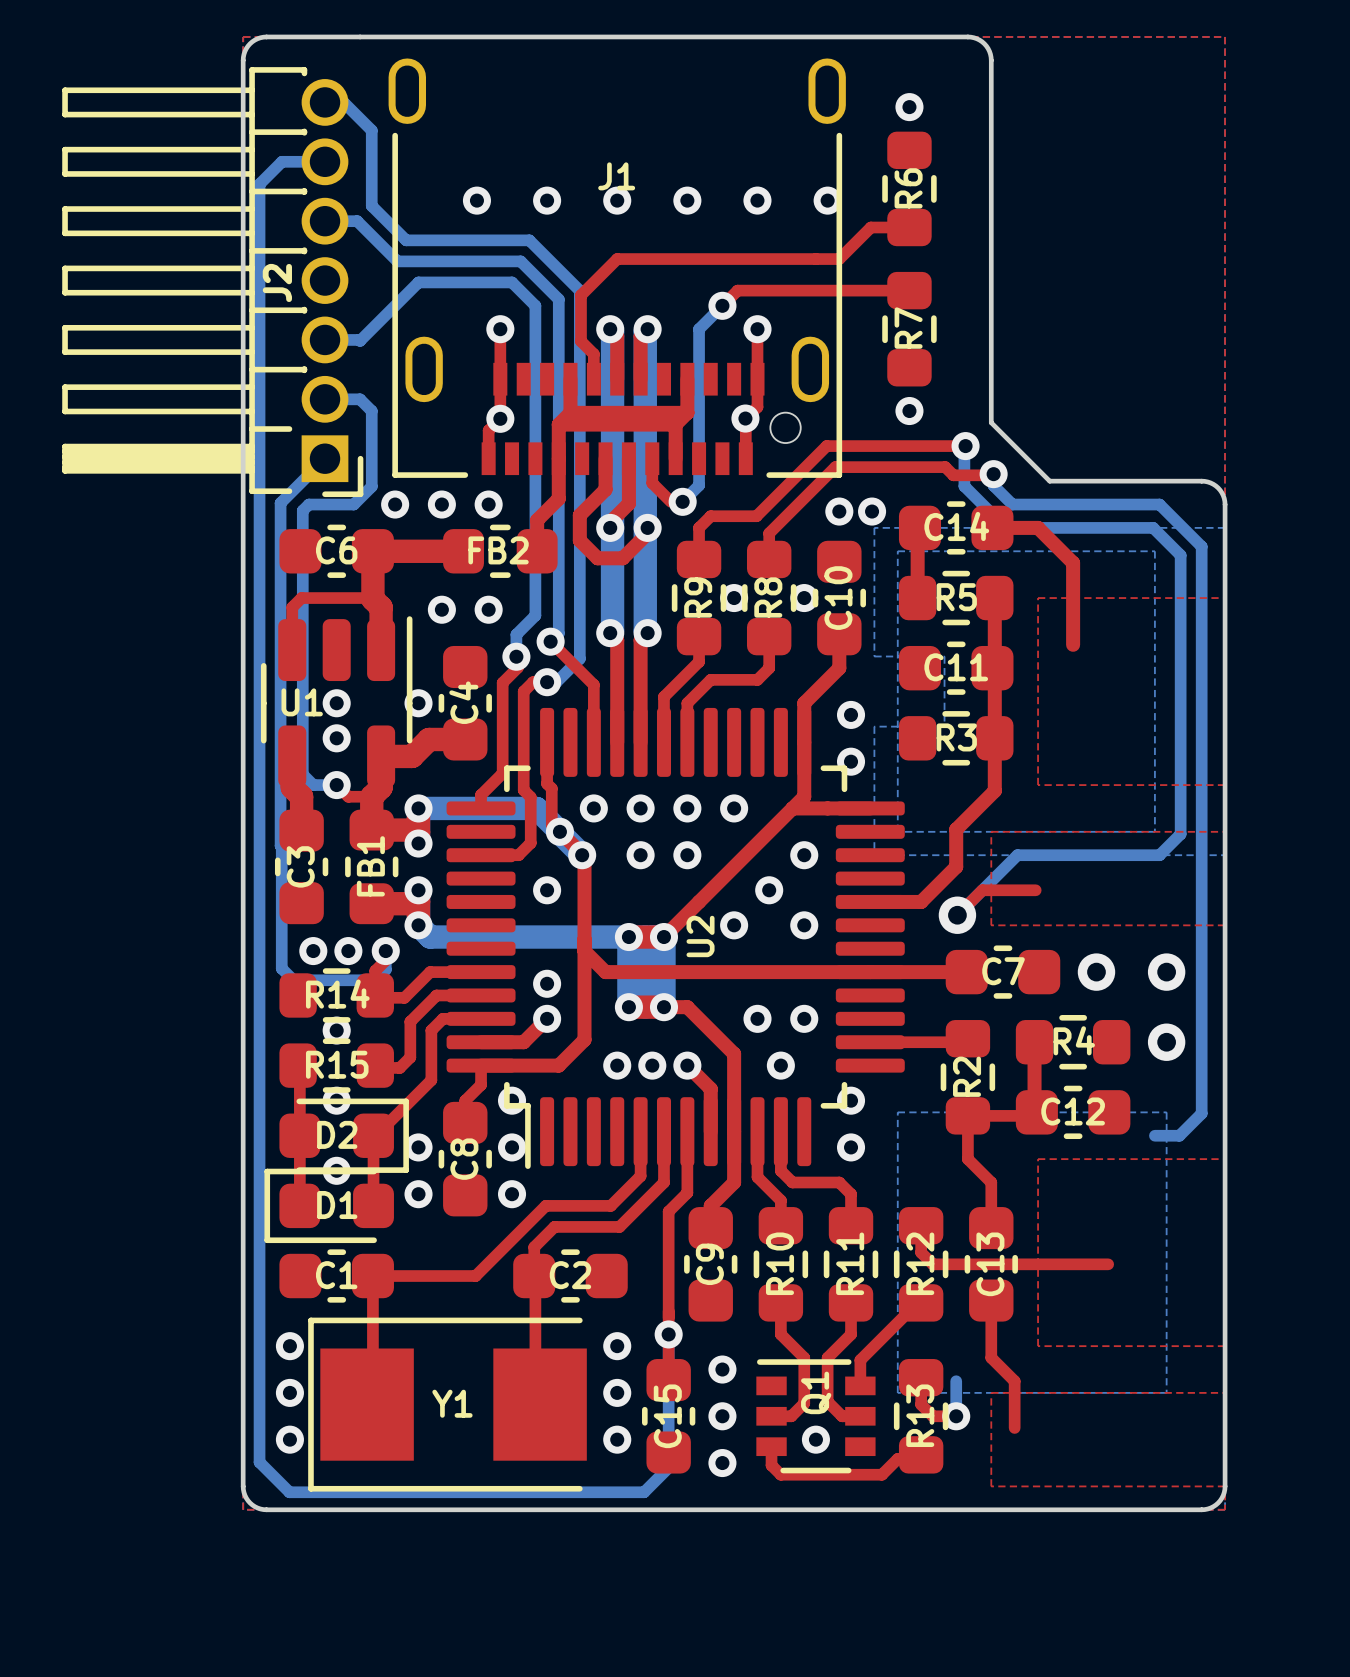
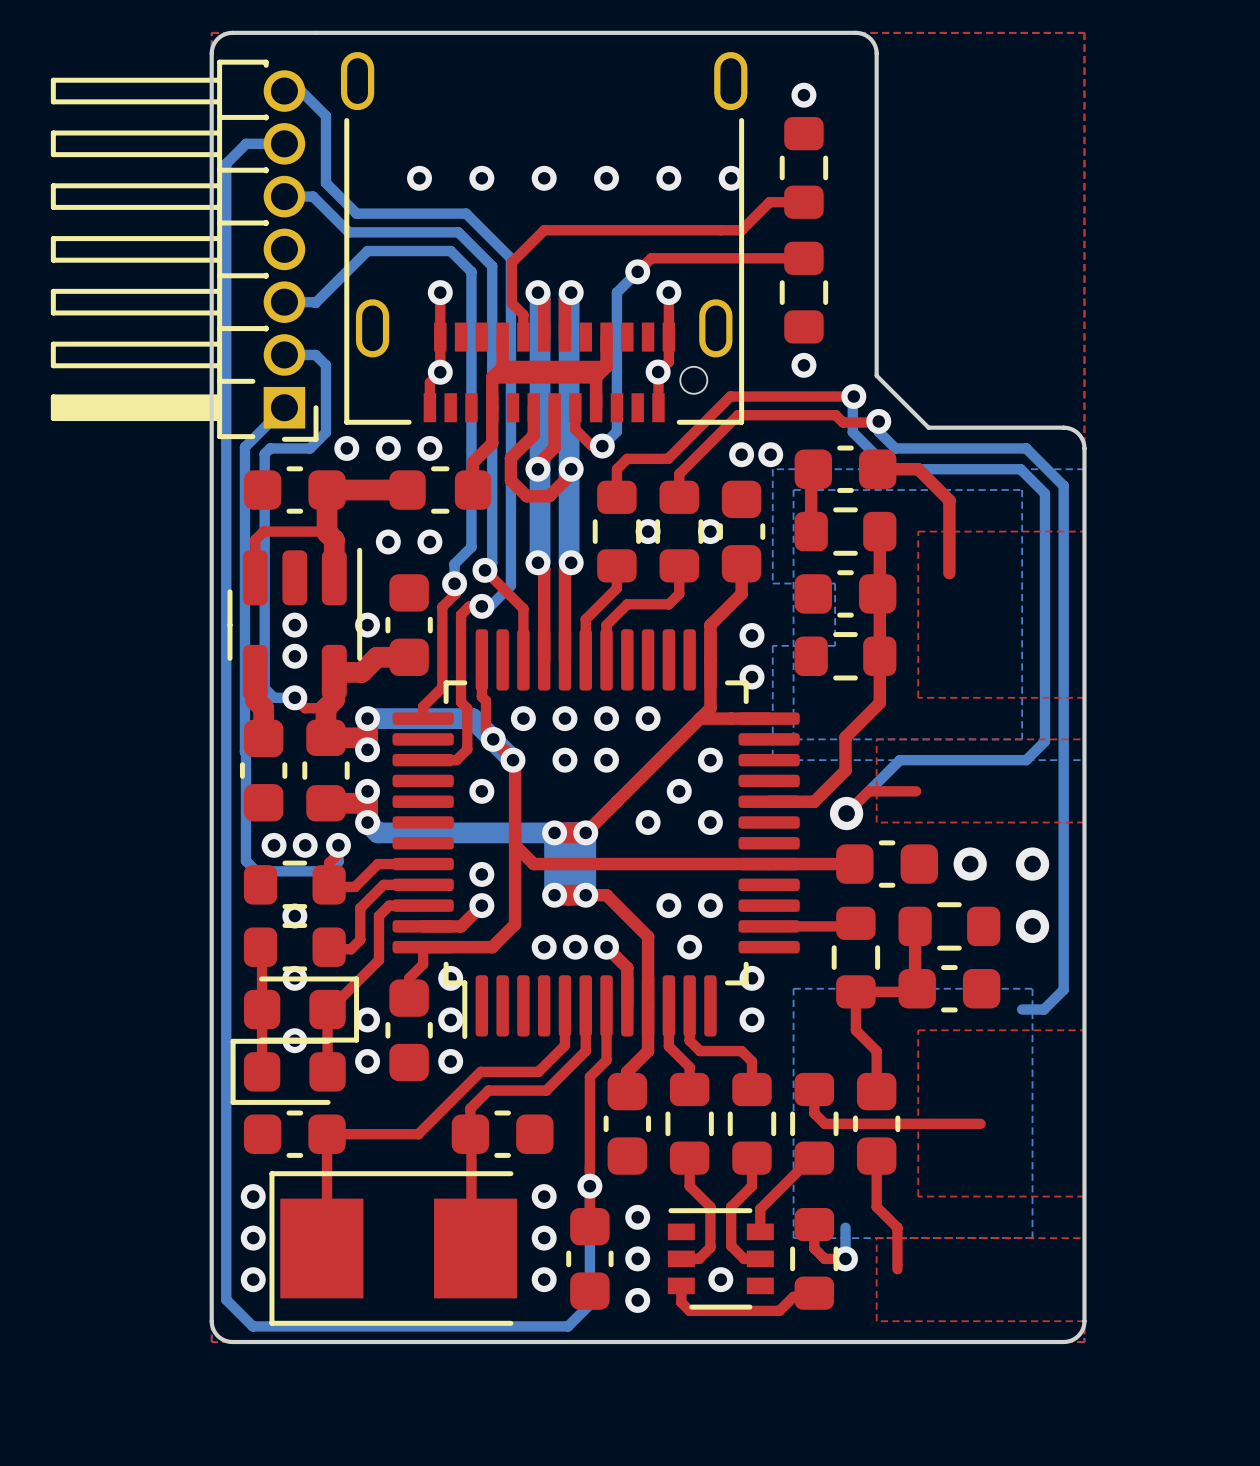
J1 name: J1 (616, 176) -> none
R6 name: R6 (908, 188) -> none
J2 name: J2 (277, 282) -> none
R7 name: R7 (908, 328) -> none
C14 name: C14 (956, 526) -> none
C6 name: C6 (336, 550) -> none
FB2 name: FB2 (498, 550) -> none
R9 name: R9 (698, 597) -> none
R8 name: R8 (768, 597) -> none
R5 name: R5 (956, 597) -> none
C10 name: C10 (838, 598) -> none
C11 name: C11 (956, 667) -> none
U1 name: U1 (302, 702) -> none
C4 name: C4 (463, 702) -> none
R3 name: R3 (956, 737) -> none
C3 name: C3 (300, 866) -> none
FB1 name: FB1 (370, 866) -> none
U2 name: U2 (700, 936) -> none
C7 name: C7 (1003, 971) -> none
R14 name: R14 (337, 994) -> none
R4 name: R4 (1074, 1040) -> none
R15 name: R15 (337, 1064) -> none
R2 name: R2 (967, 1076) -> none
C12 name: C12 (1073, 1111) -> none
D2 name: D2 (337, 1134) -> none
C8 name: C8 (464, 1159) -> none
D1 name: D1 (337, 1205) -> none
R10 name: R10 (780, 1263) -> none
R11 name: R11 (850, 1263) -> none
R12 name: R12 (920, 1263) -> none
C9 name: C9 (709, 1264) -> none
C13 name: C13 (990, 1264) -> none
C1 name: C1 (336, 1275) -> none
C2 name: C2 (570, 1275) -> none
Q1 name: Q1 (816, 1392) -> none
Y1 name: Y1 (452, 1403) -> none
R13 name: R13 (920, 1415) -> none
C15 name: C15 (667, 1416) -> none

